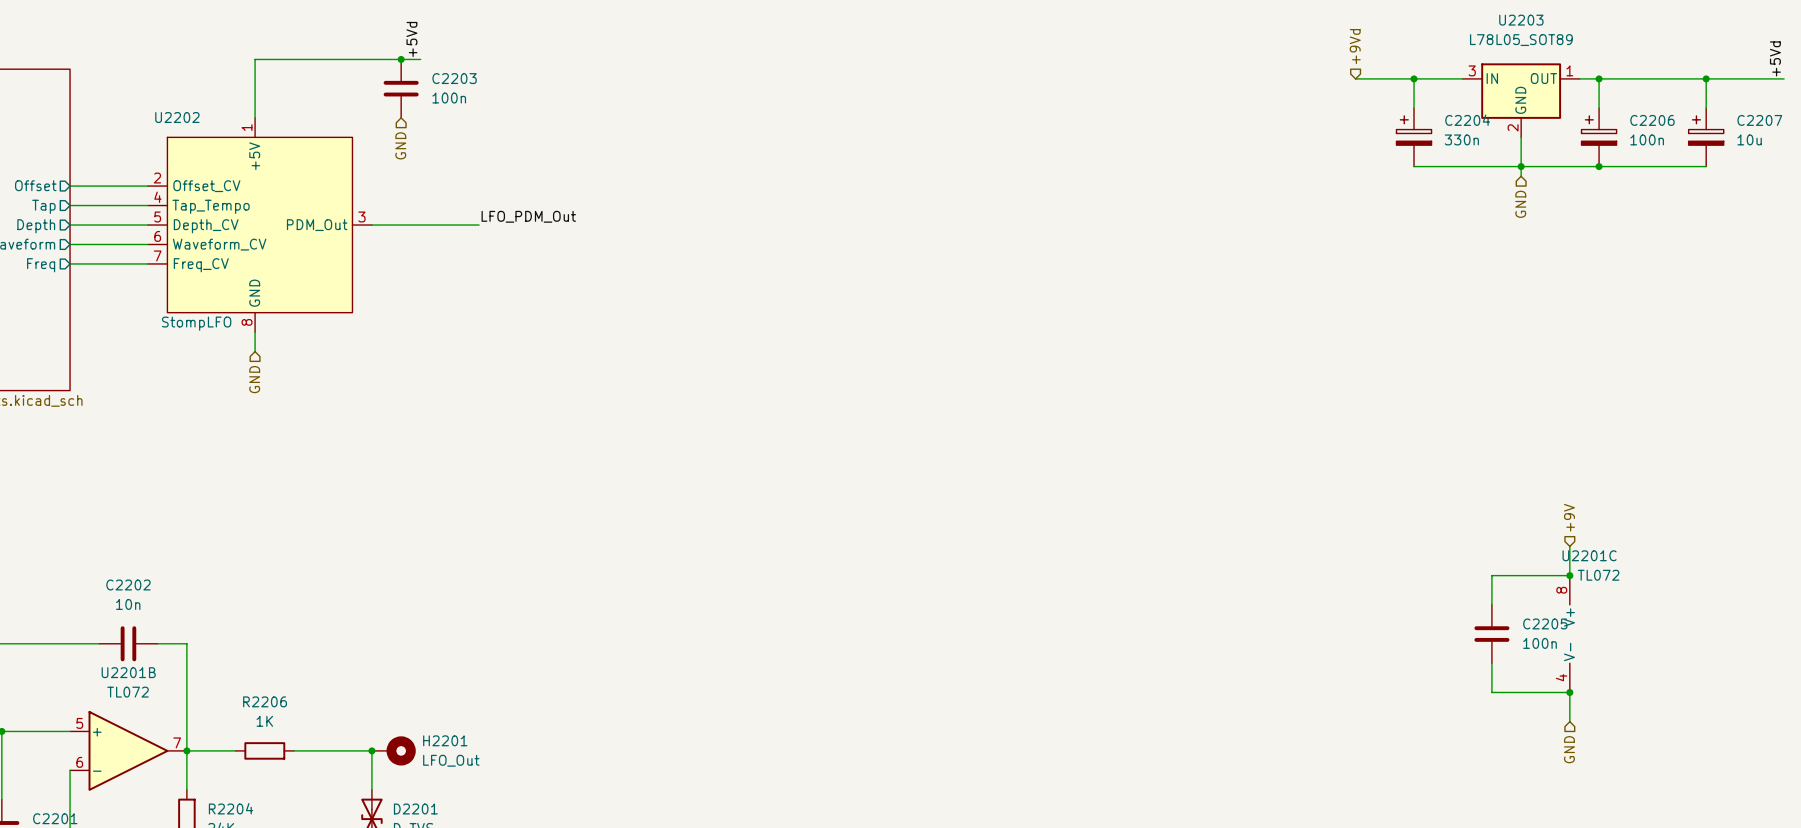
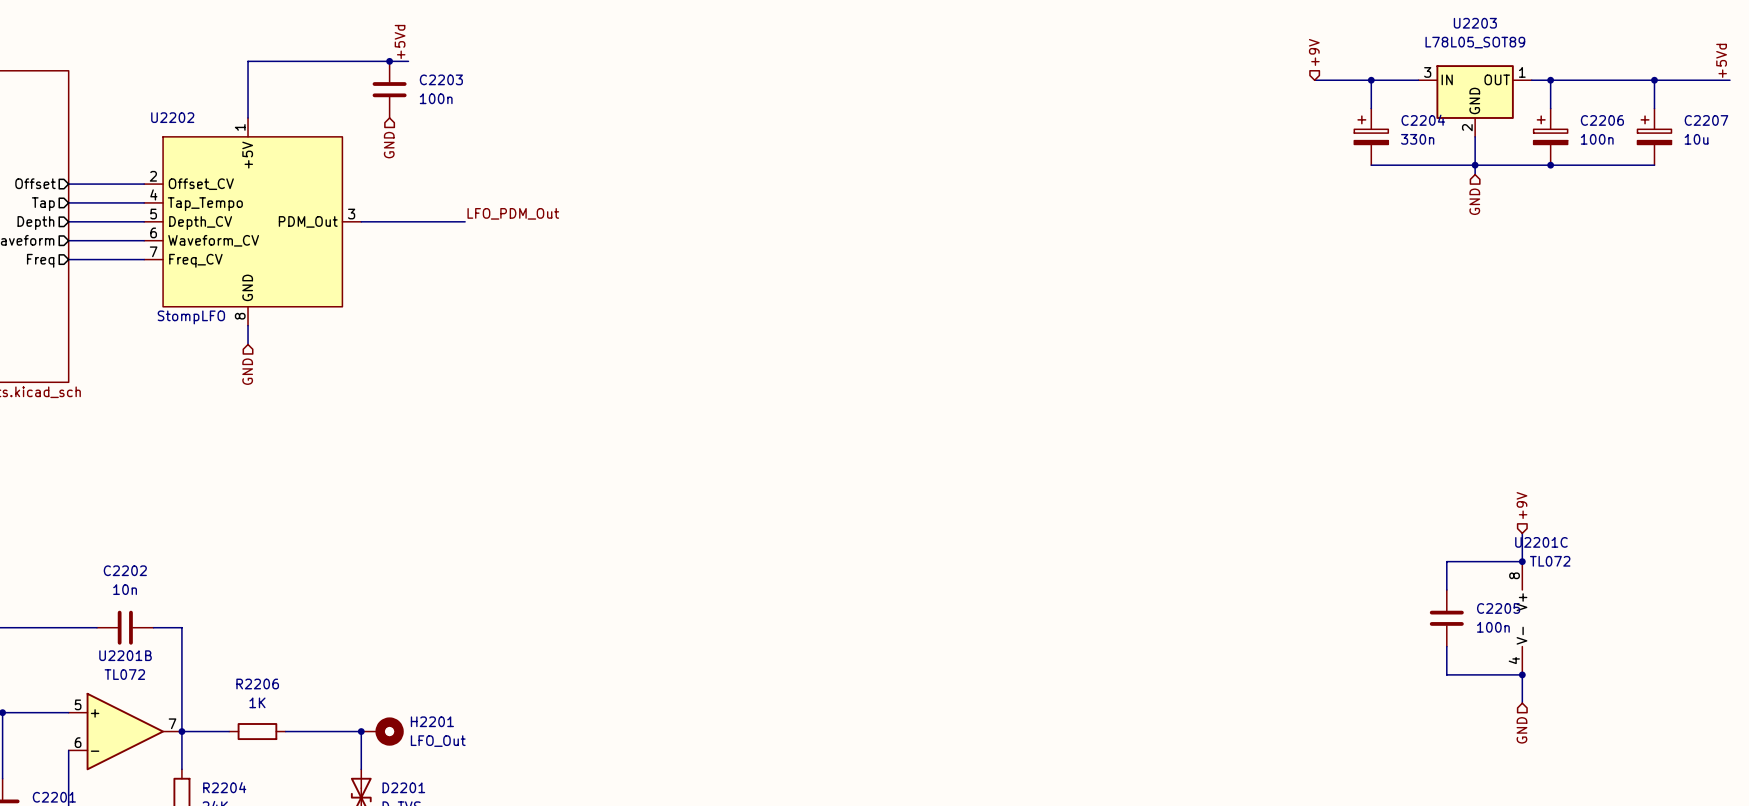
hierarchical label: +9Vd (1355, 46) -> +9V (1314, 52)

